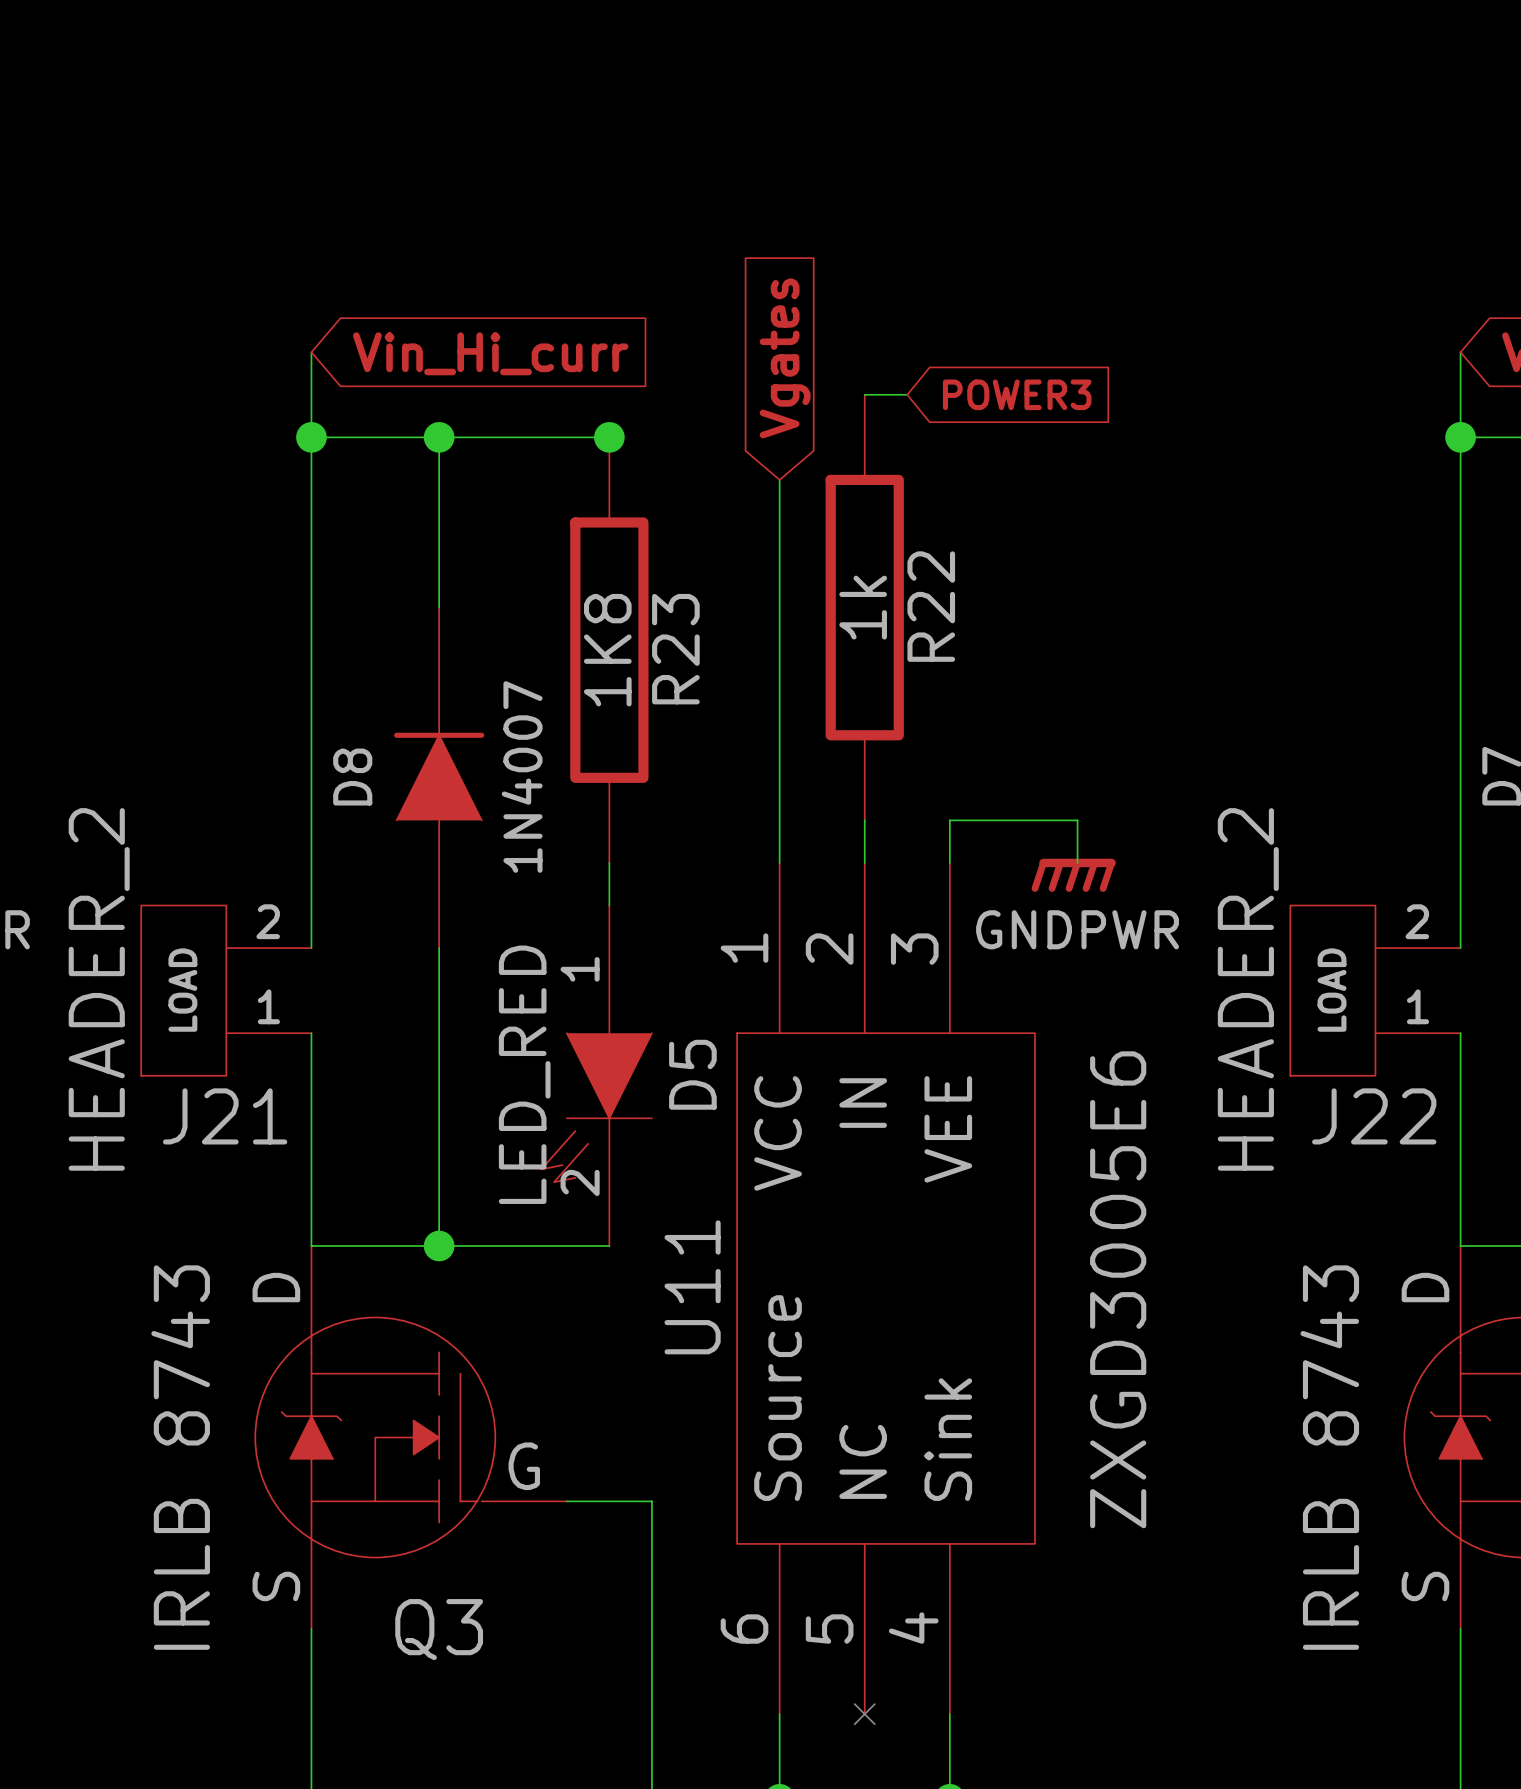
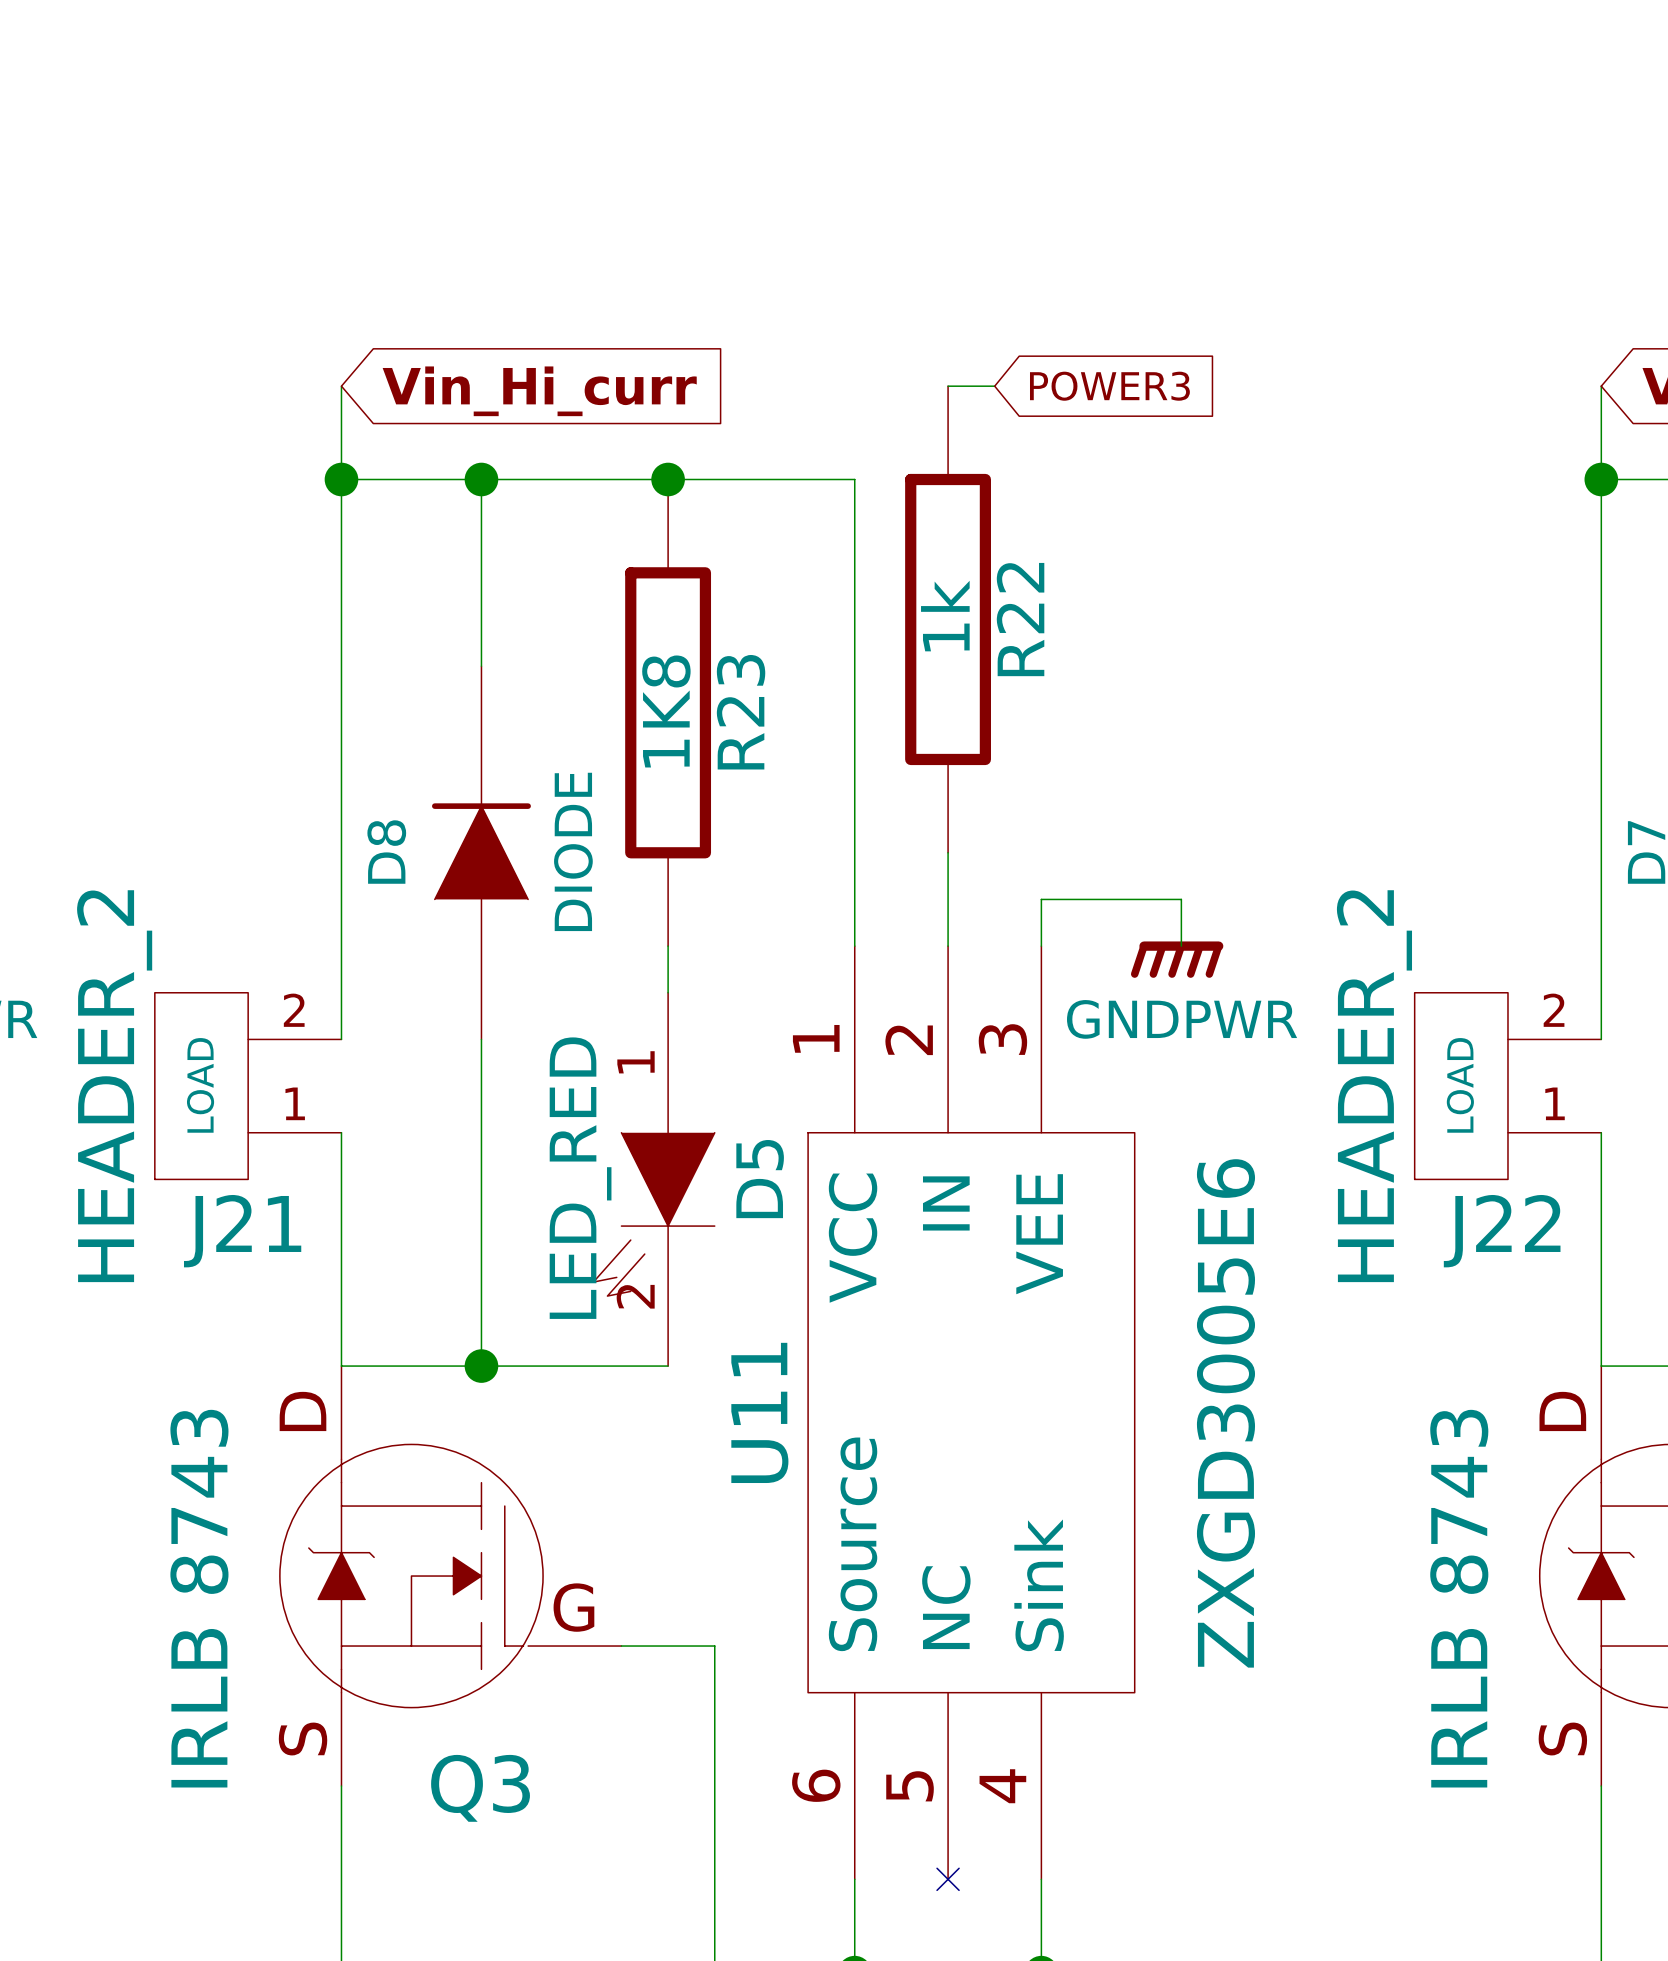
global label: Vgates (785, 358) -> none
wire: (864, 394) (907, 394) -> (948, 386) (994, 386)
global label position: POWER3 (1017, 394) -> POWER3 (1109, 386)
wire: none -> (668, 479) (854, 479) (854, 526)
R22 position: (864, 607) -> (948, 619)
D8 value: 1N4007 (522, 777) -> DIODE (573, 851)

